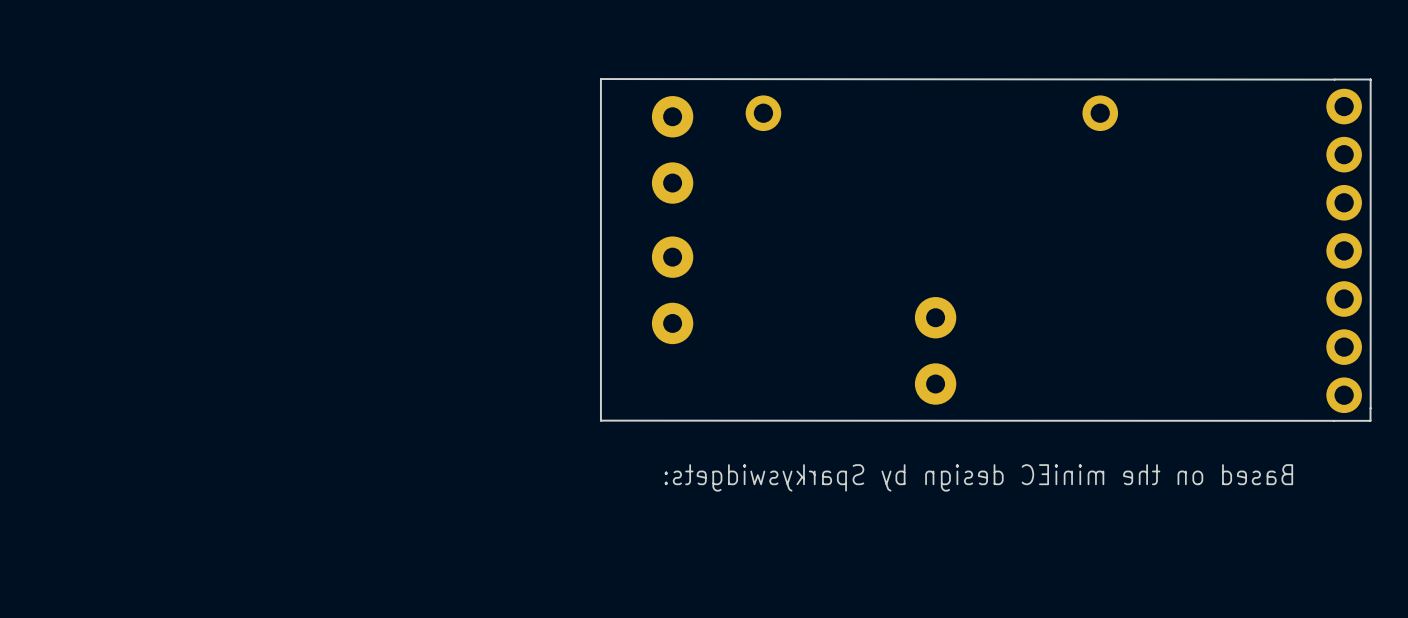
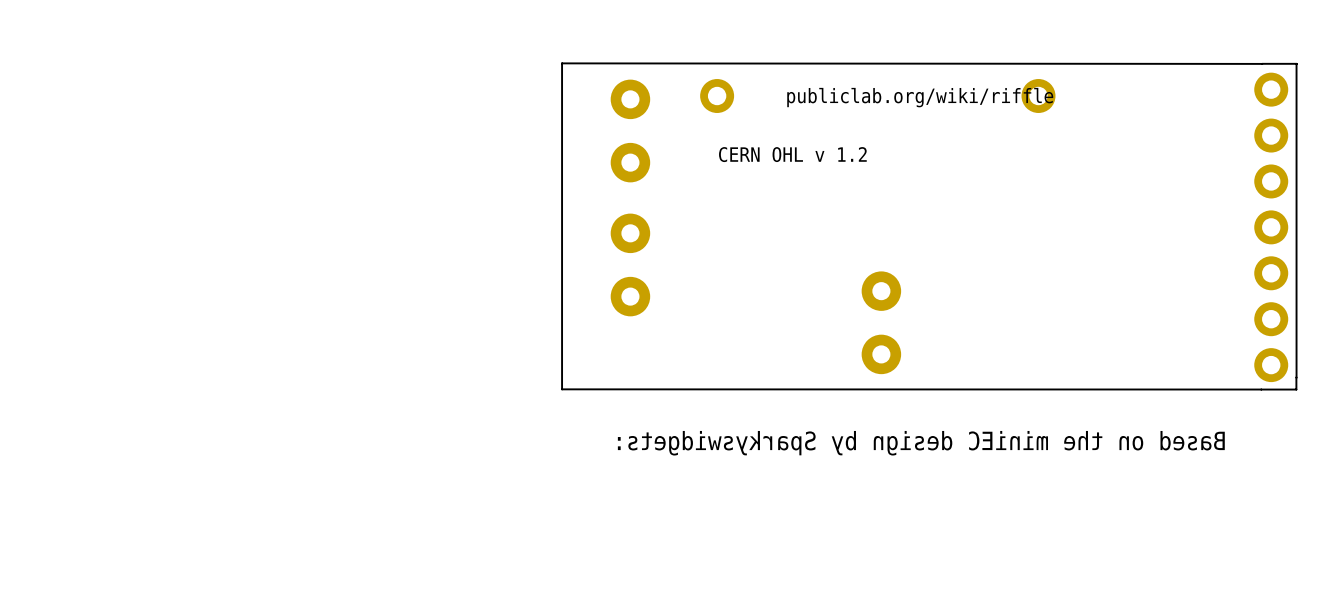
text: none -> publiclab.org/wiki/riffle (920, 97)
text: none -> CERN OHL v 1.2 (792, 154)

